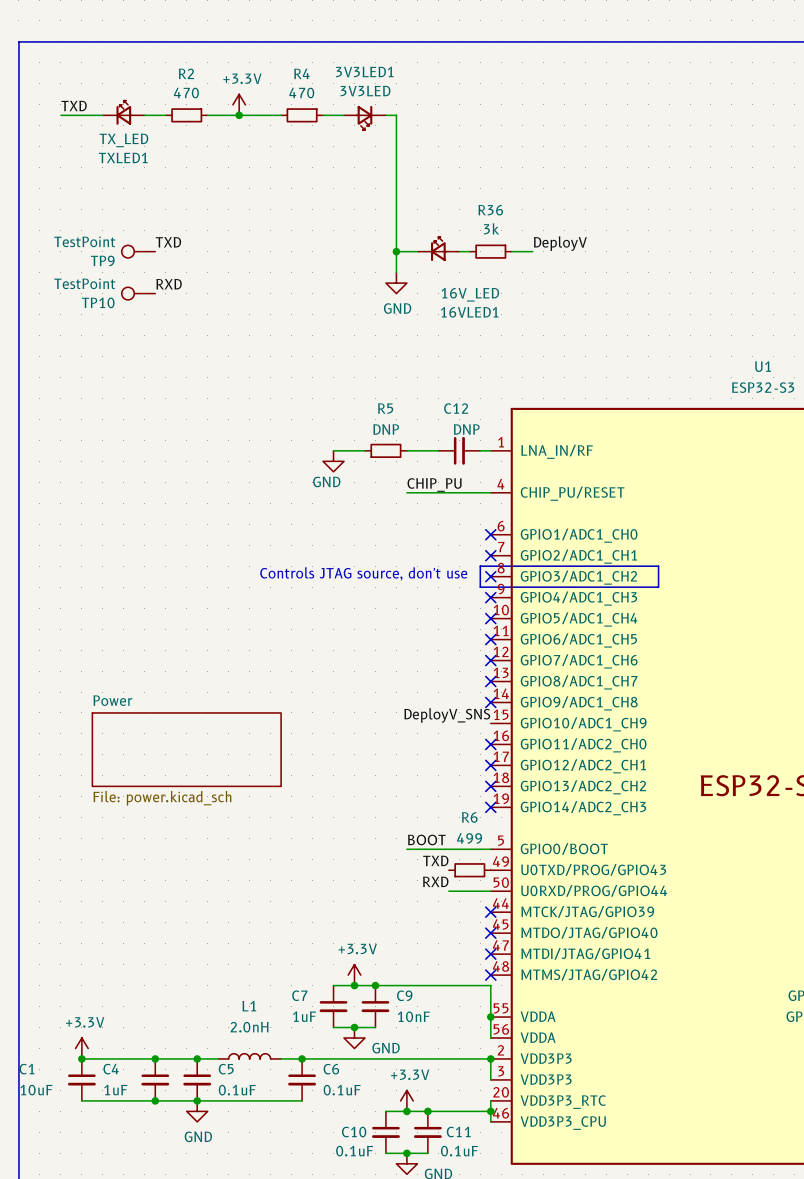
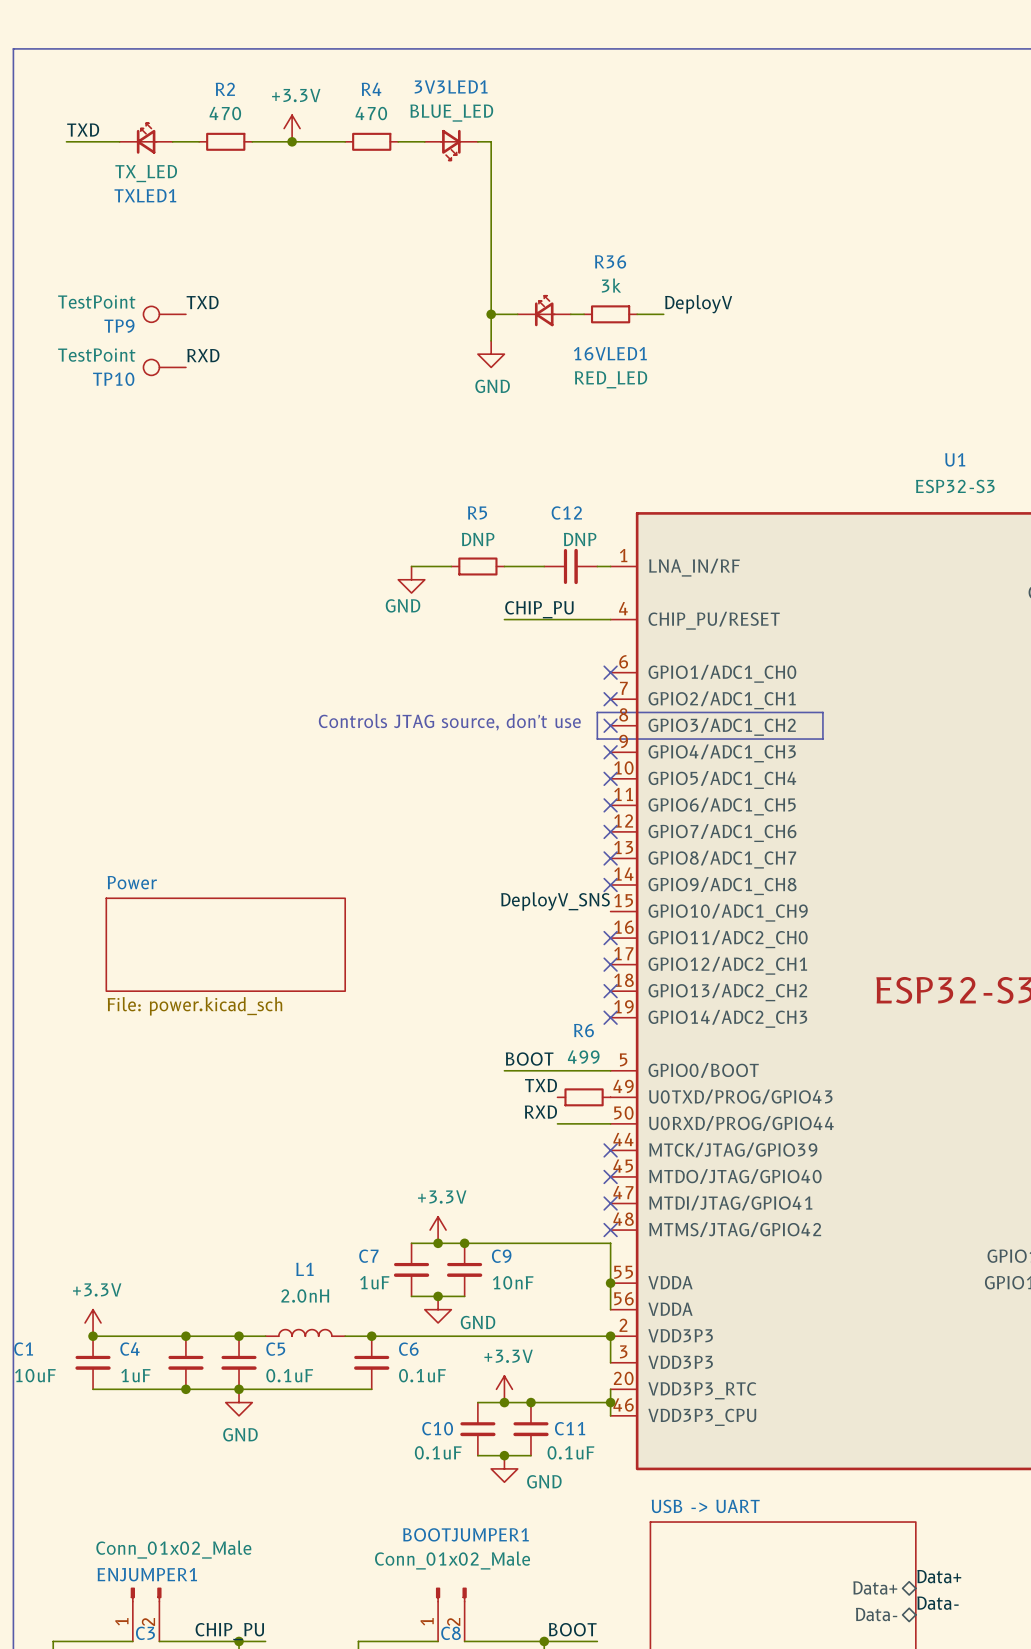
3V3LED1 value: 3V3LED (365, 91) -> BLUE_LED (451, 113)
16VLED1 value: 16V_LED (470, 294) -> RED_LED (611, 379)
16VLED1 name position: 16VLED1 (469, 312) -> 16VLED1 (610, 353)

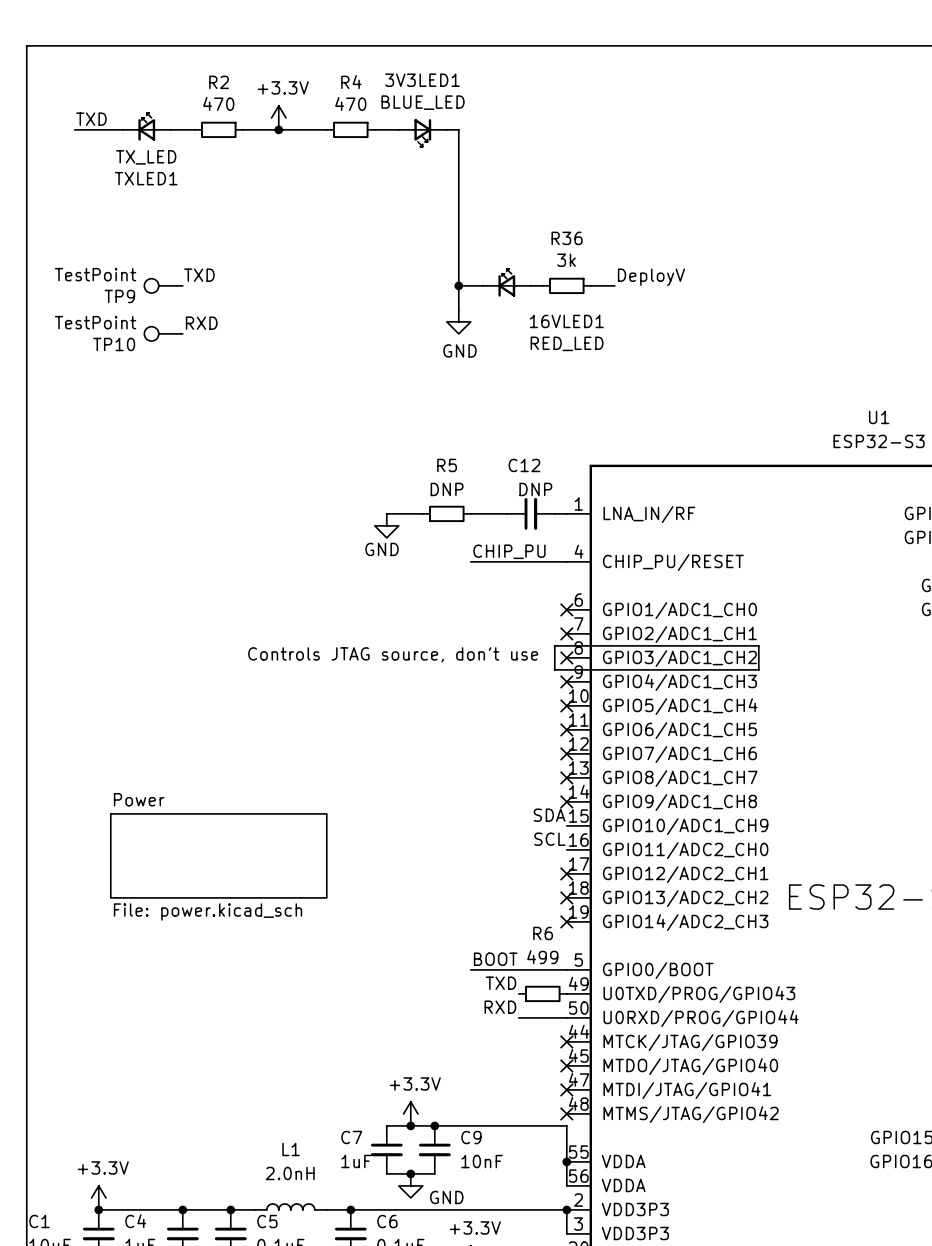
label: DeployV_SNS (555, 901) -> SDA (549, 815)
label: none -> SCL (549, 839)
no-connect mark: (610, 938) -> none

